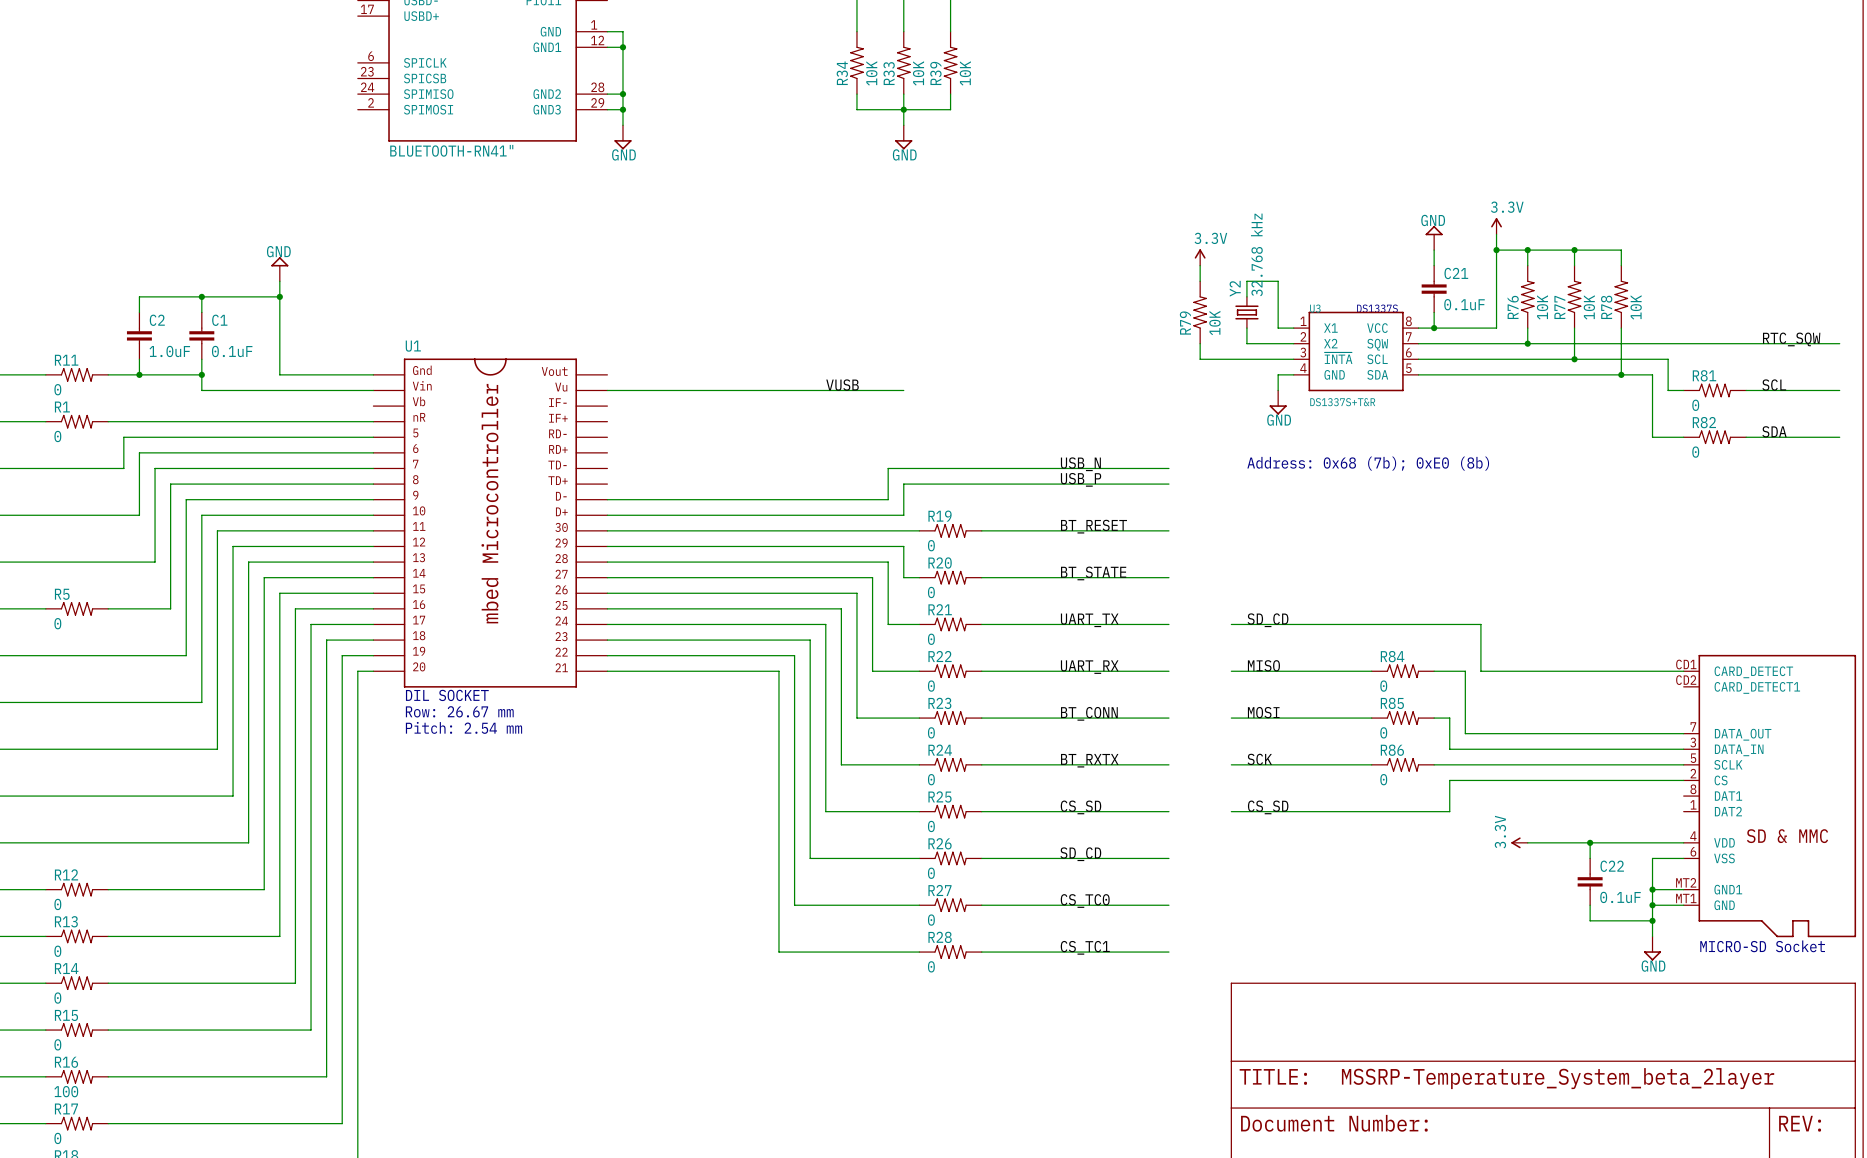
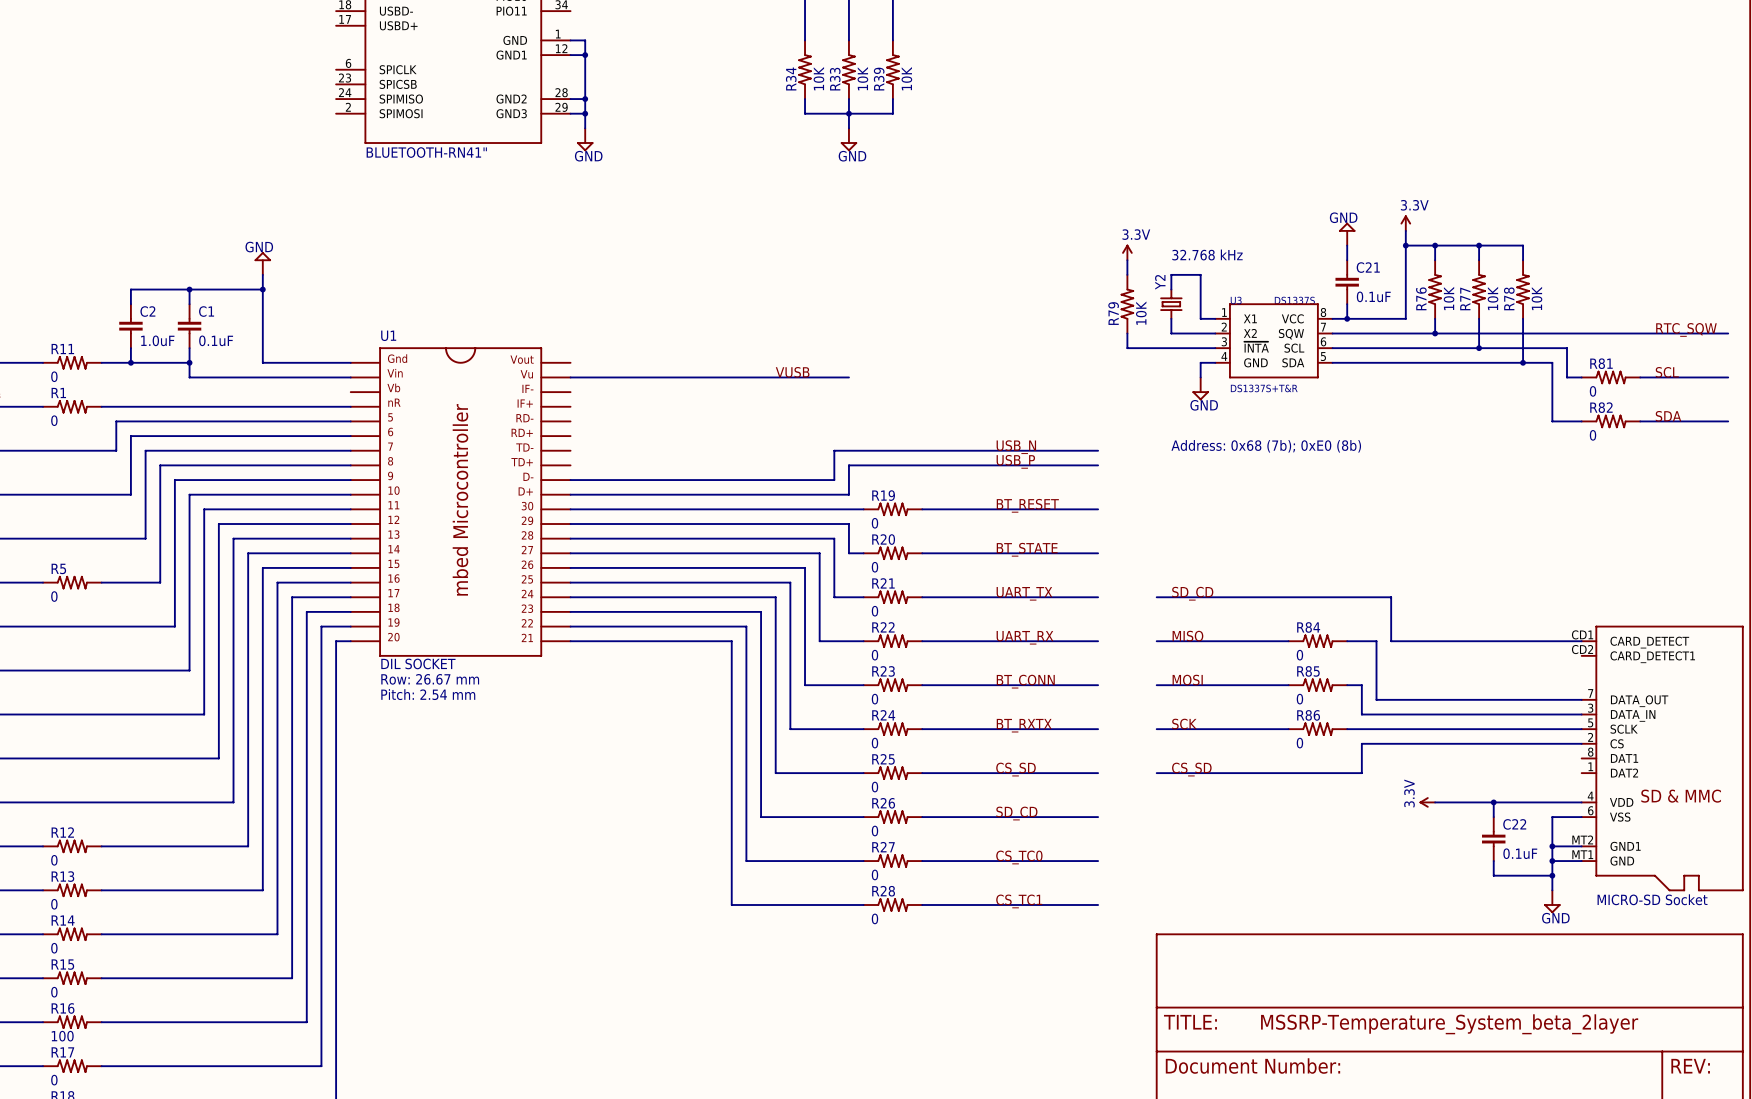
Y2 value: 32.768 kHz (1256, 254) -> none
text: none -> 32.768 kHz (1207, 254)

